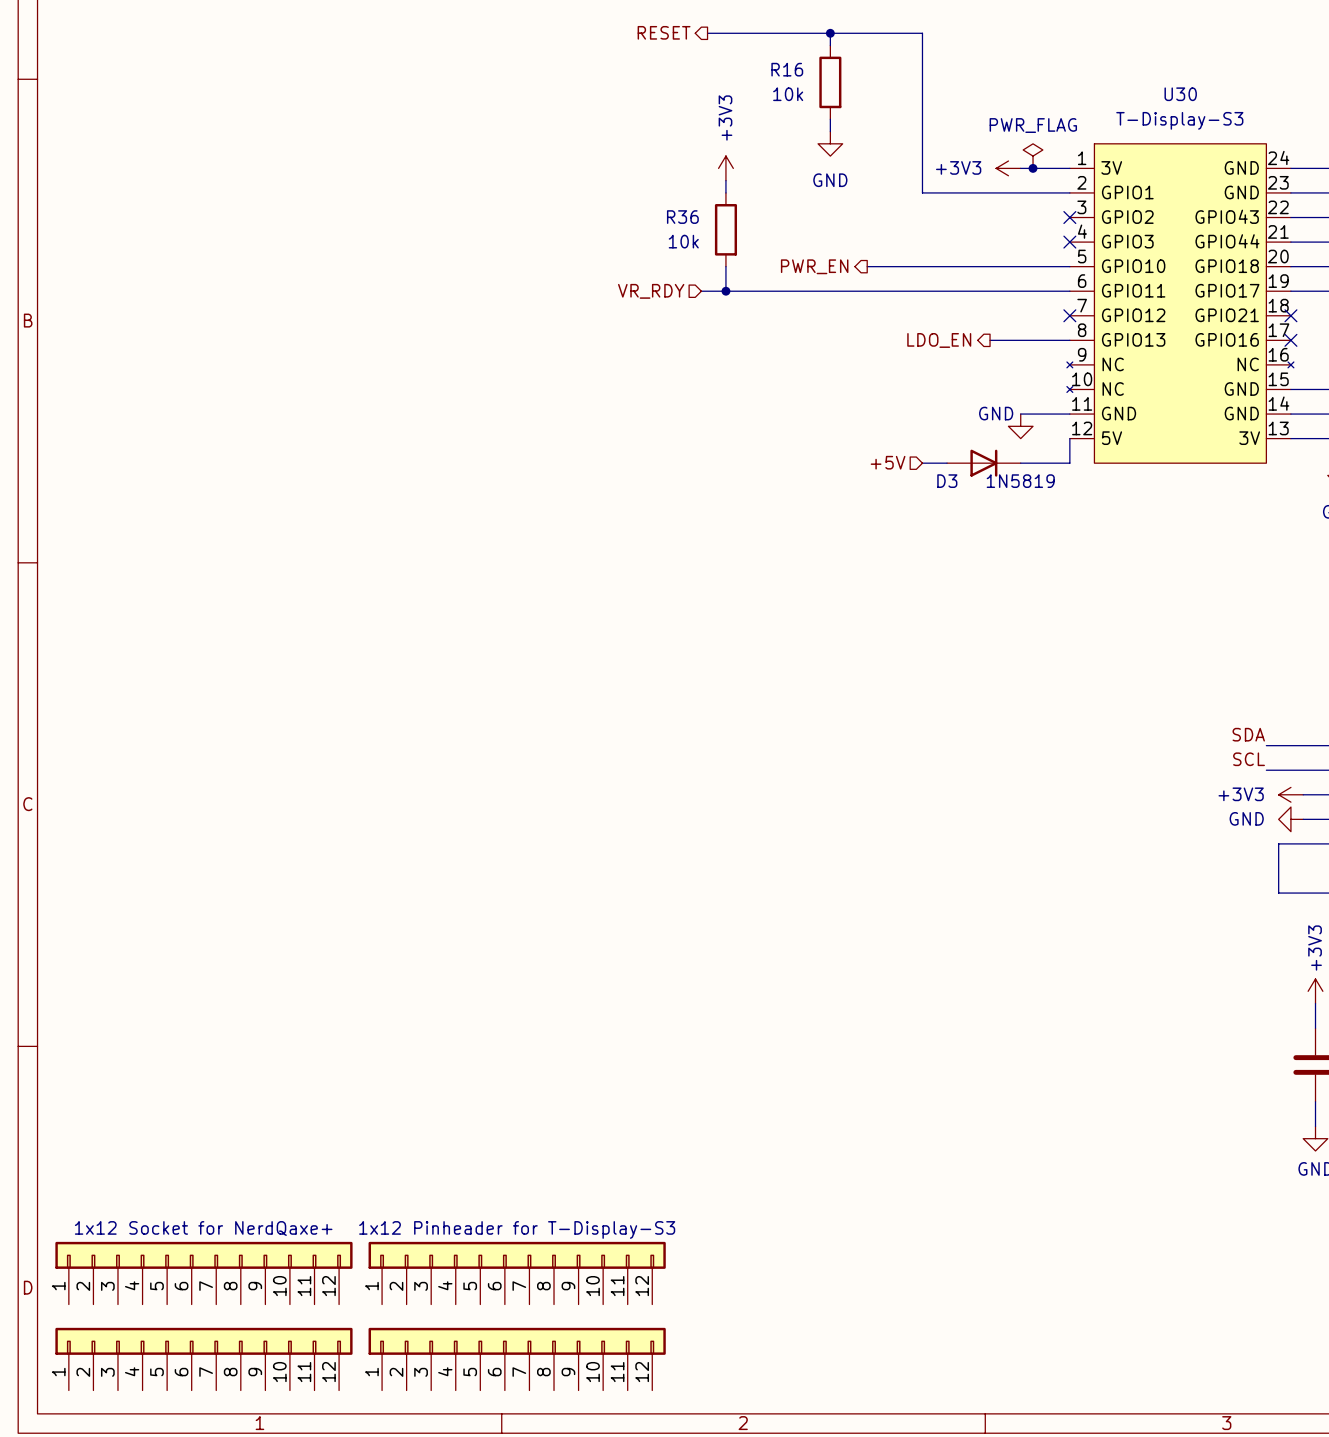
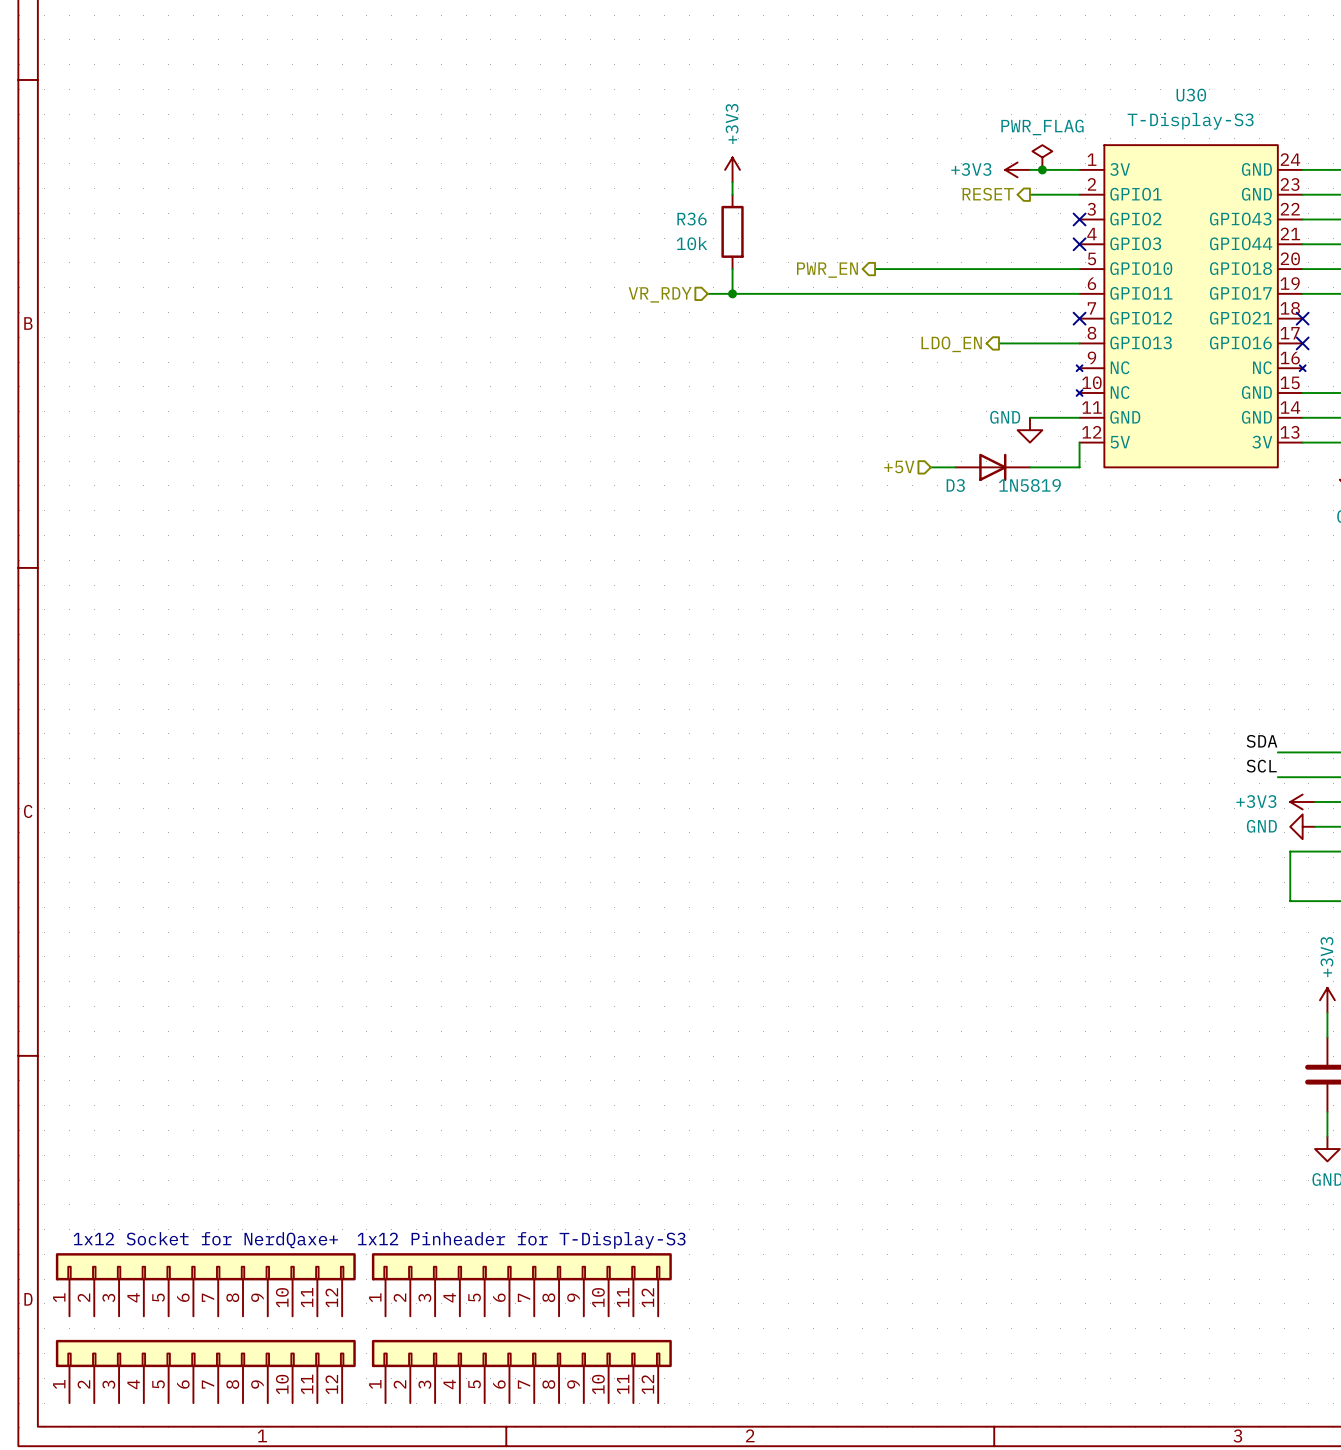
hierarchical label: RESET (664, 32) -> none
wire: (707, 33) (922, 33) (922, 192) (1020, 192) -> none
wire: (830, 33) (830, 45) -> none
junction: (830, 33) -> none
R16: 10k (830, 82) -> none
wire: (830, 119) (830, 131) -> none
power symbol: GND (830, 143) -> none
hierarchical label: none -> RESET (988, 194)

